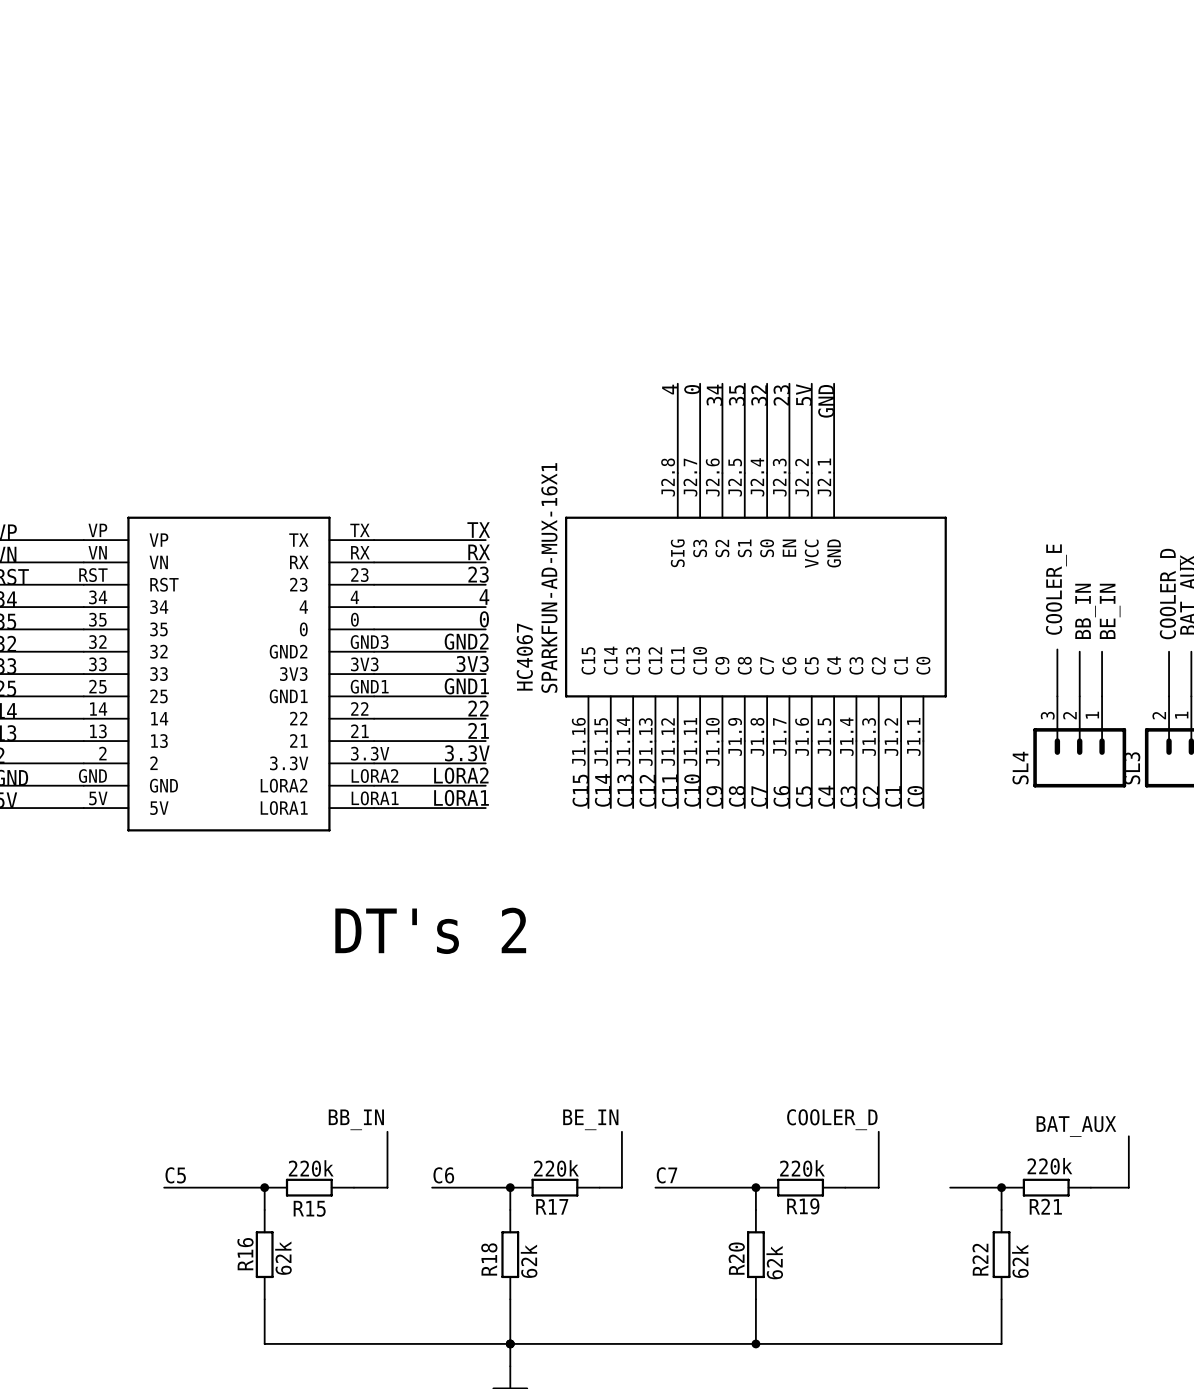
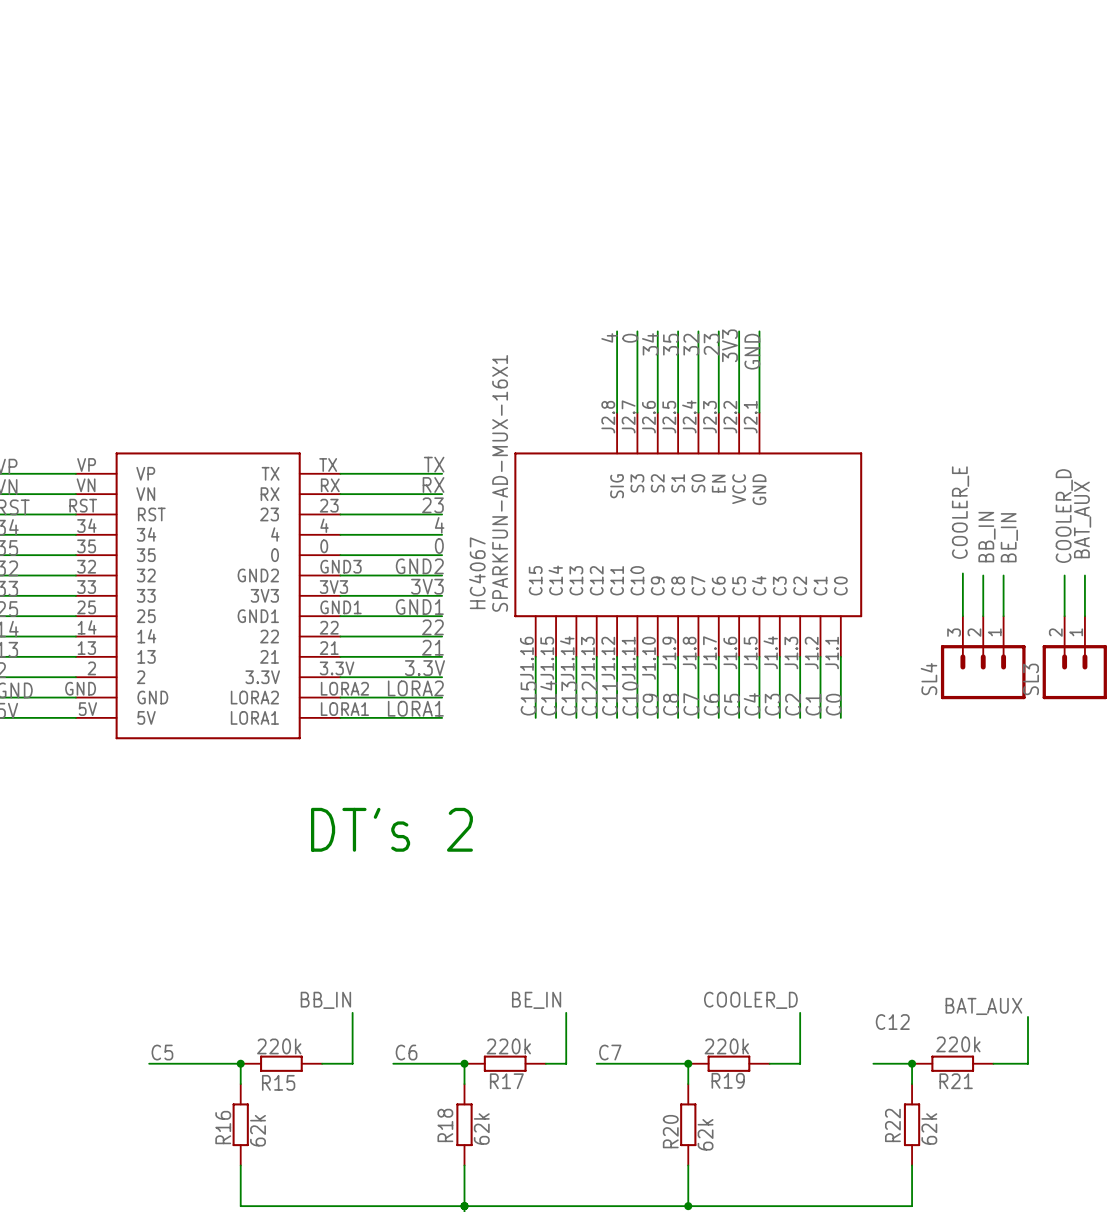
label: 5V (804, 394) -> none
label: none -> 3V3 (729, 345)
label: none -> C12 (892, 1022)
wire: (950, 1187) (959, 1187) -> none

